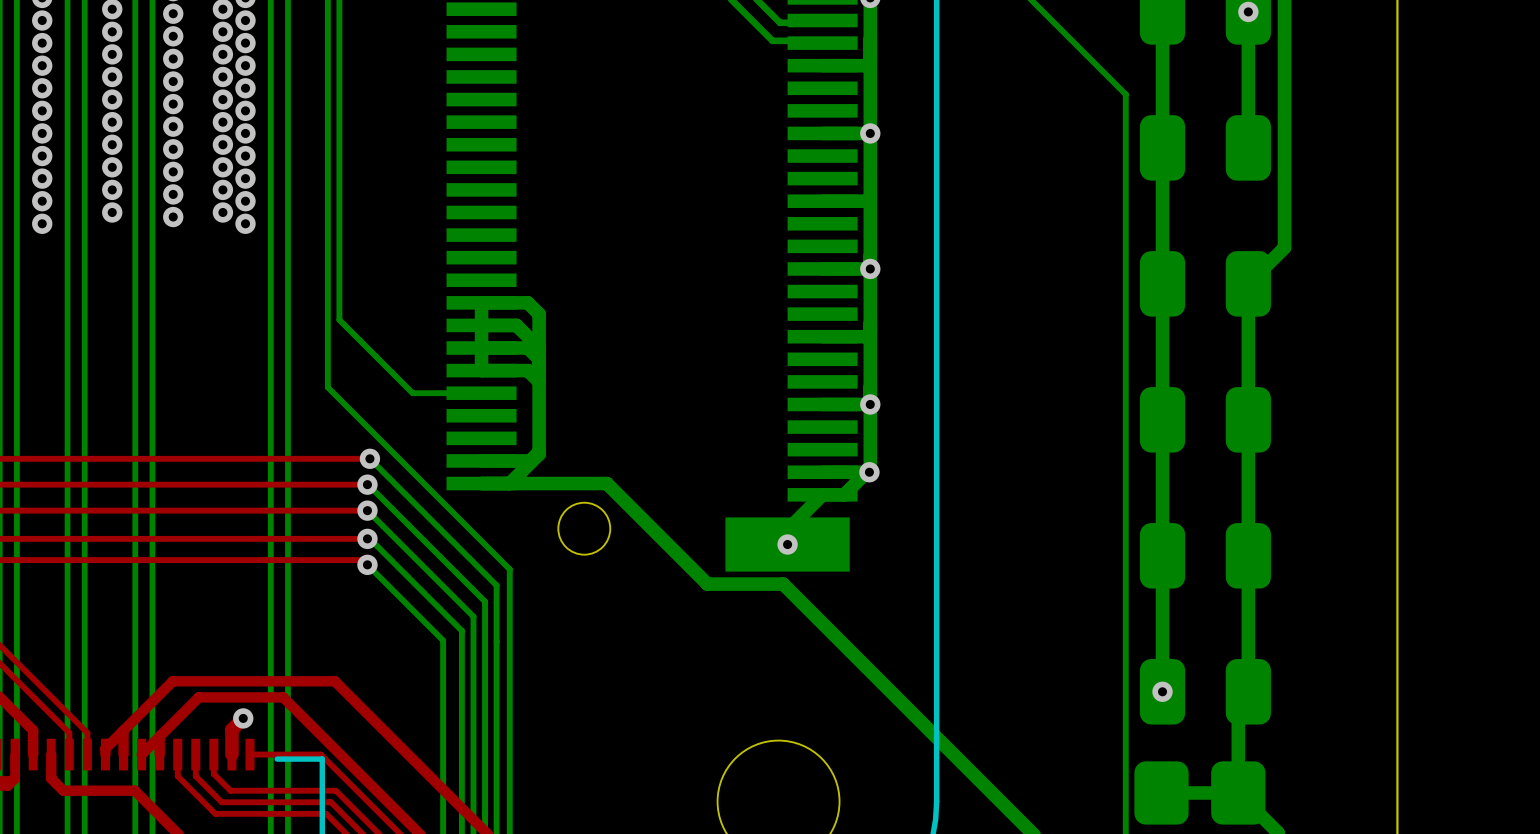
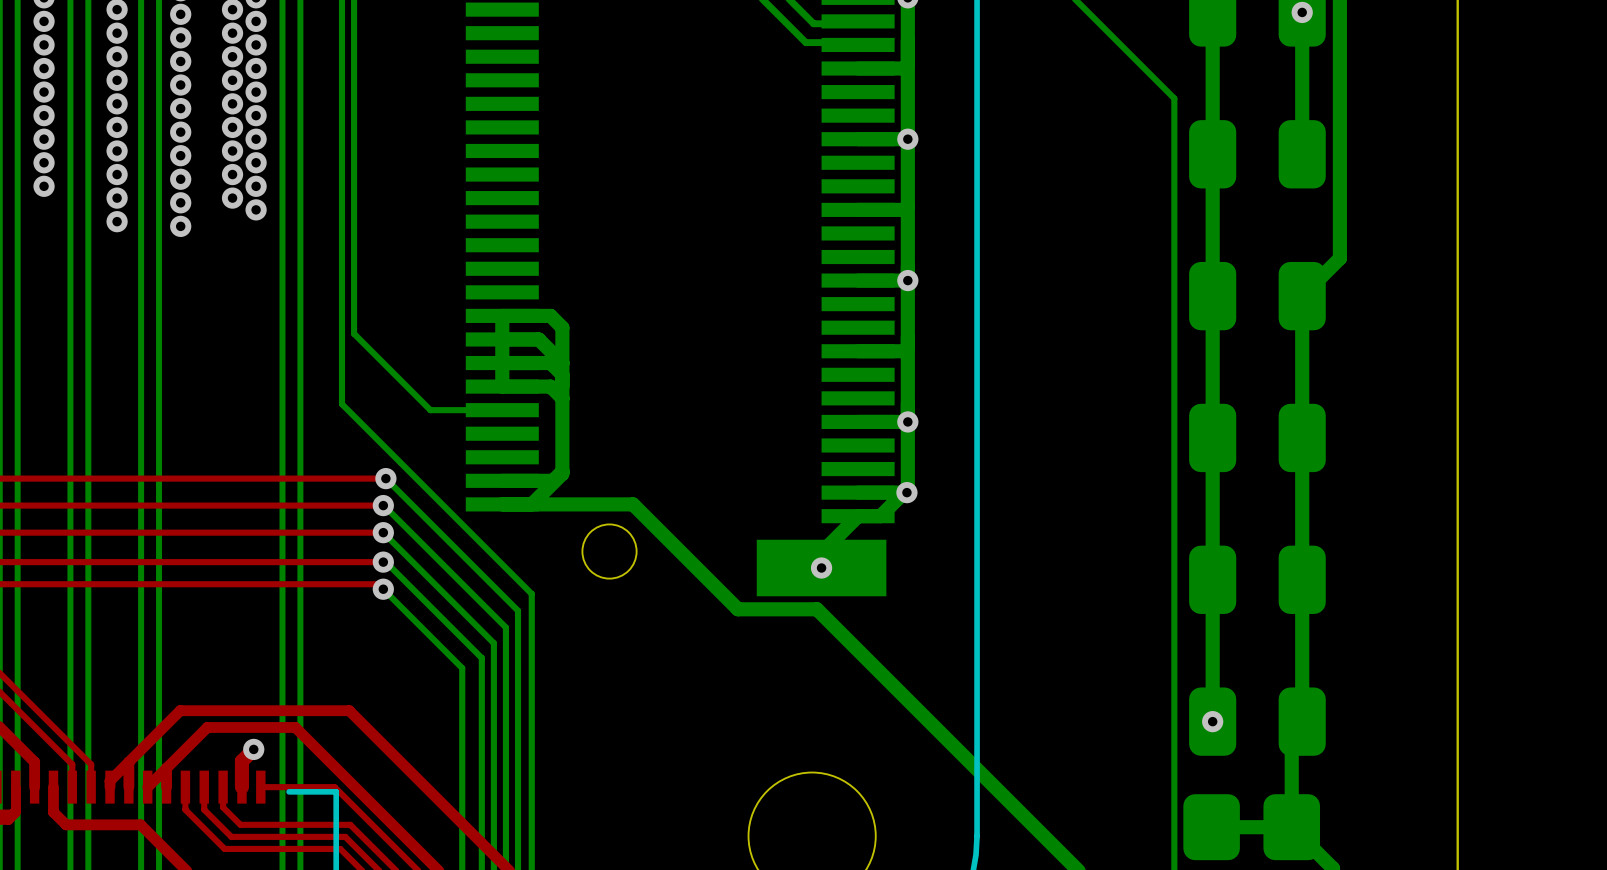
via: (42, 201) -> none
via: (222, 212) -> none
via: (42, 223) -> none
via: (245, 223) -> none

